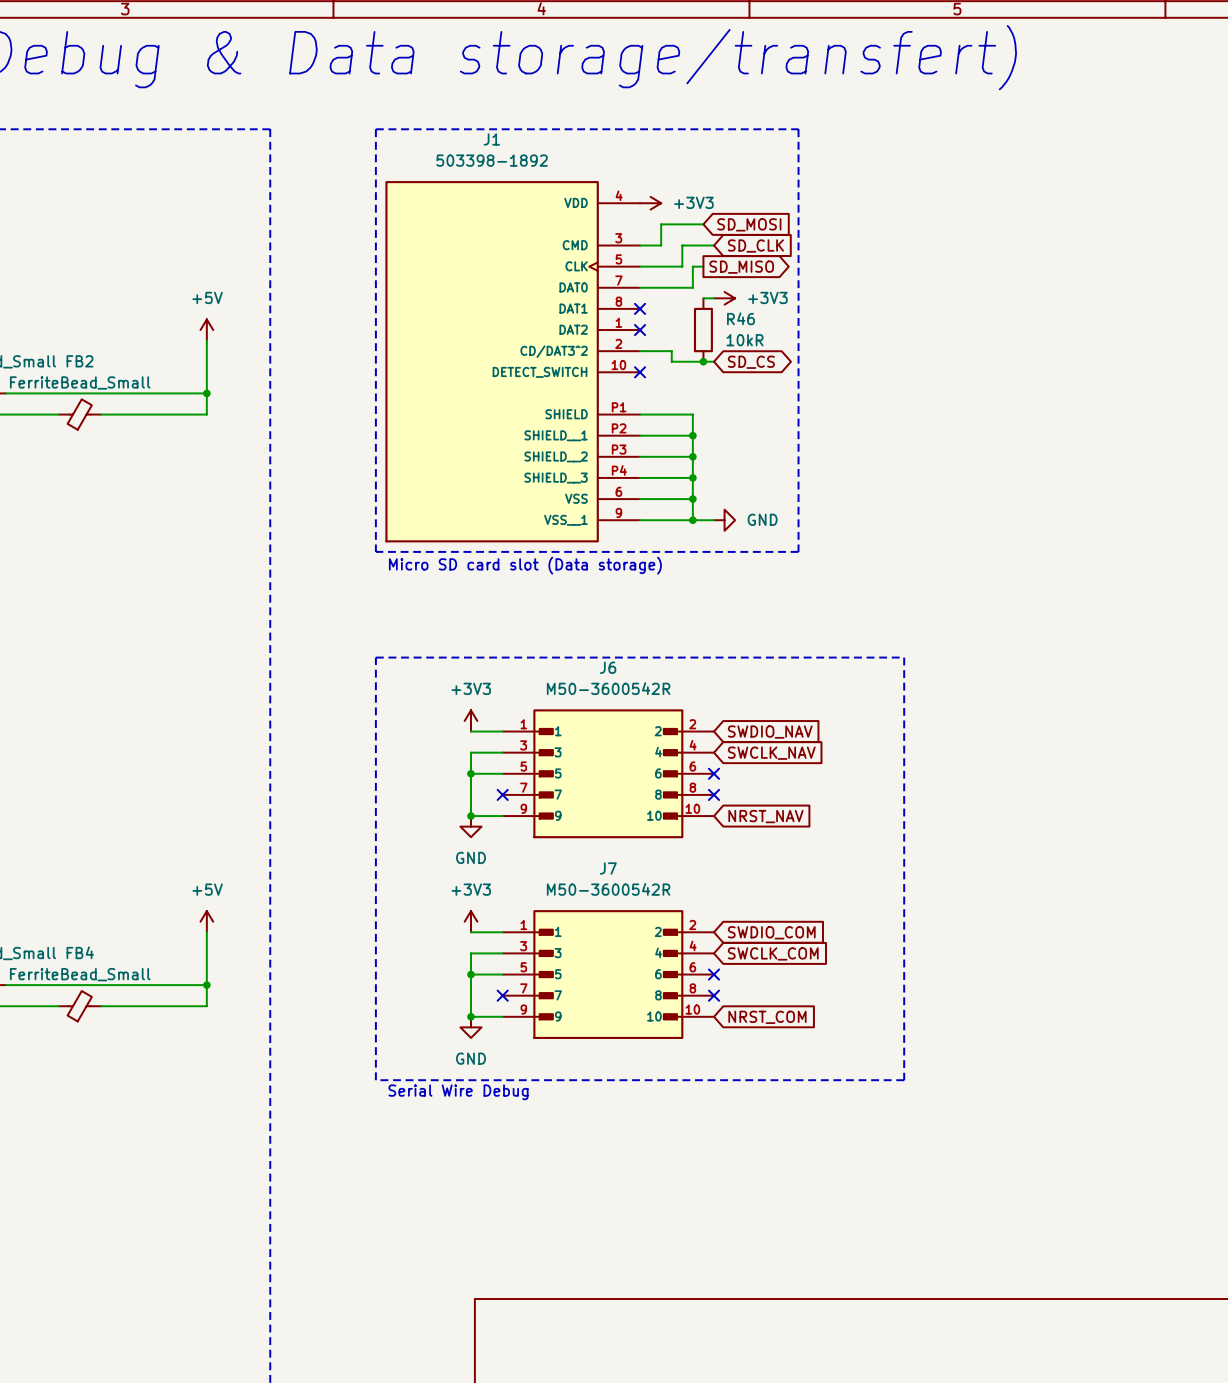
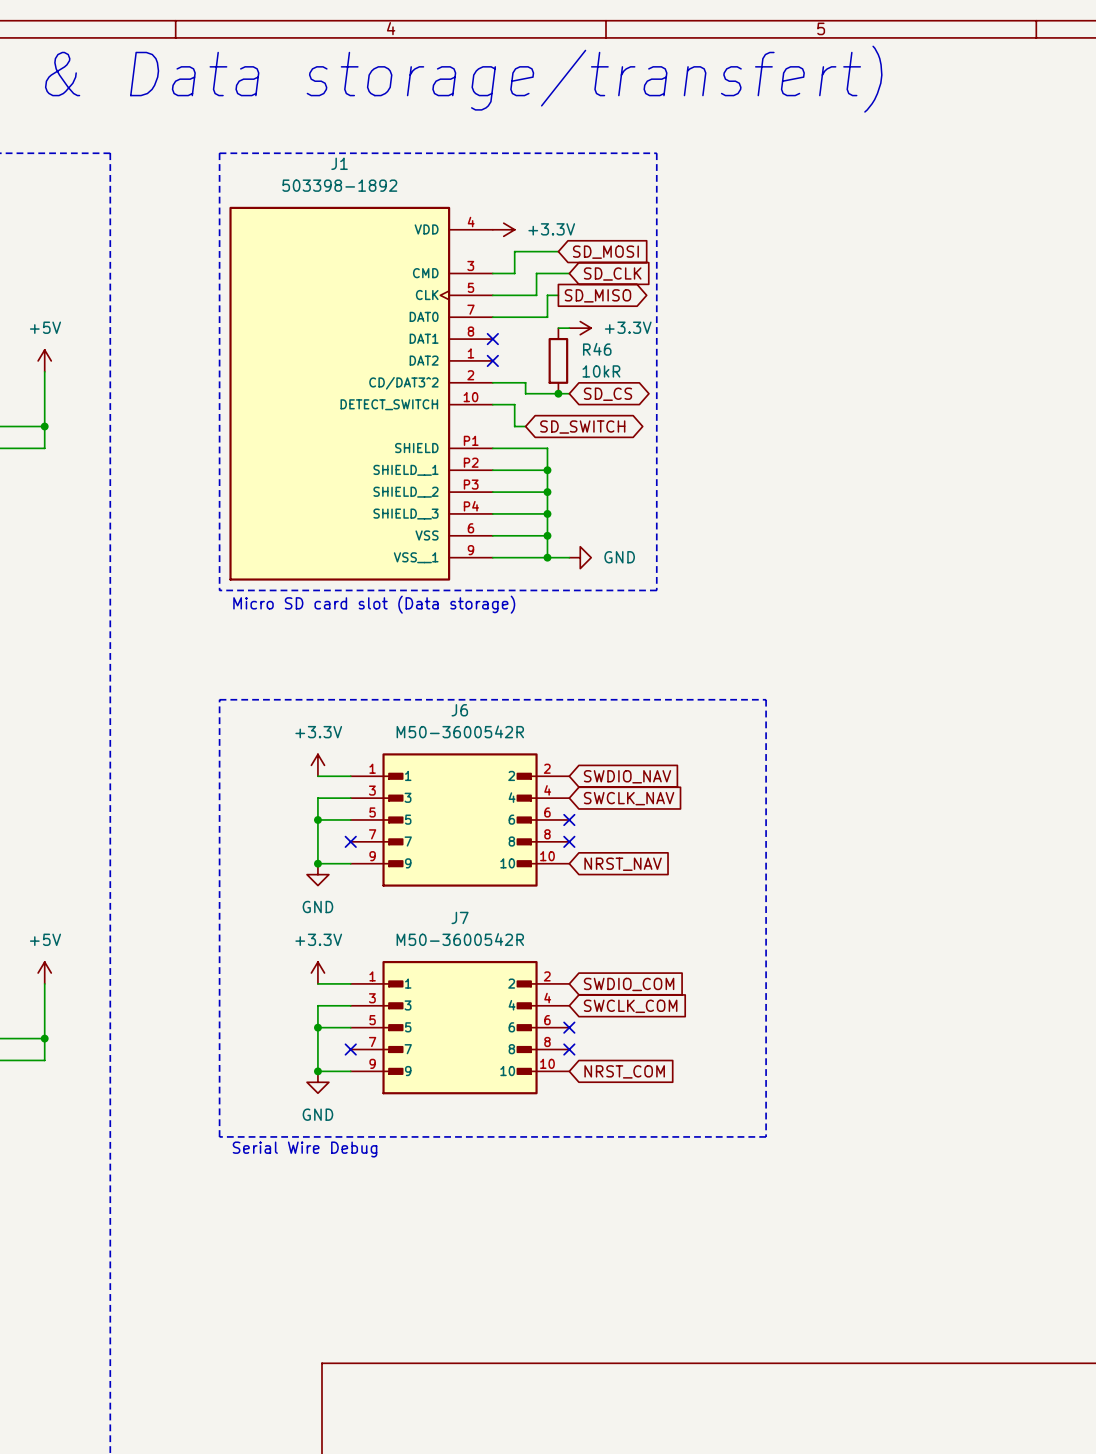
power symbol: +3V3 (650, 203) -> +3.3V (503, 229)
power symbol: +3V3 (724, 298) -> +3.3V (580, 328)
wire: none -> (492, 404) (514, 404) (514, 426) (525, 426)
no-connect mark: (640, 372) -> none
global label: none -> SD_SWITCH (582, 427)
power symbol: +3V3 (470, 720) -> +3.3V (317, 765)
power symbol: +3V3 (470, 921) -> +3.3V (317, 973)

